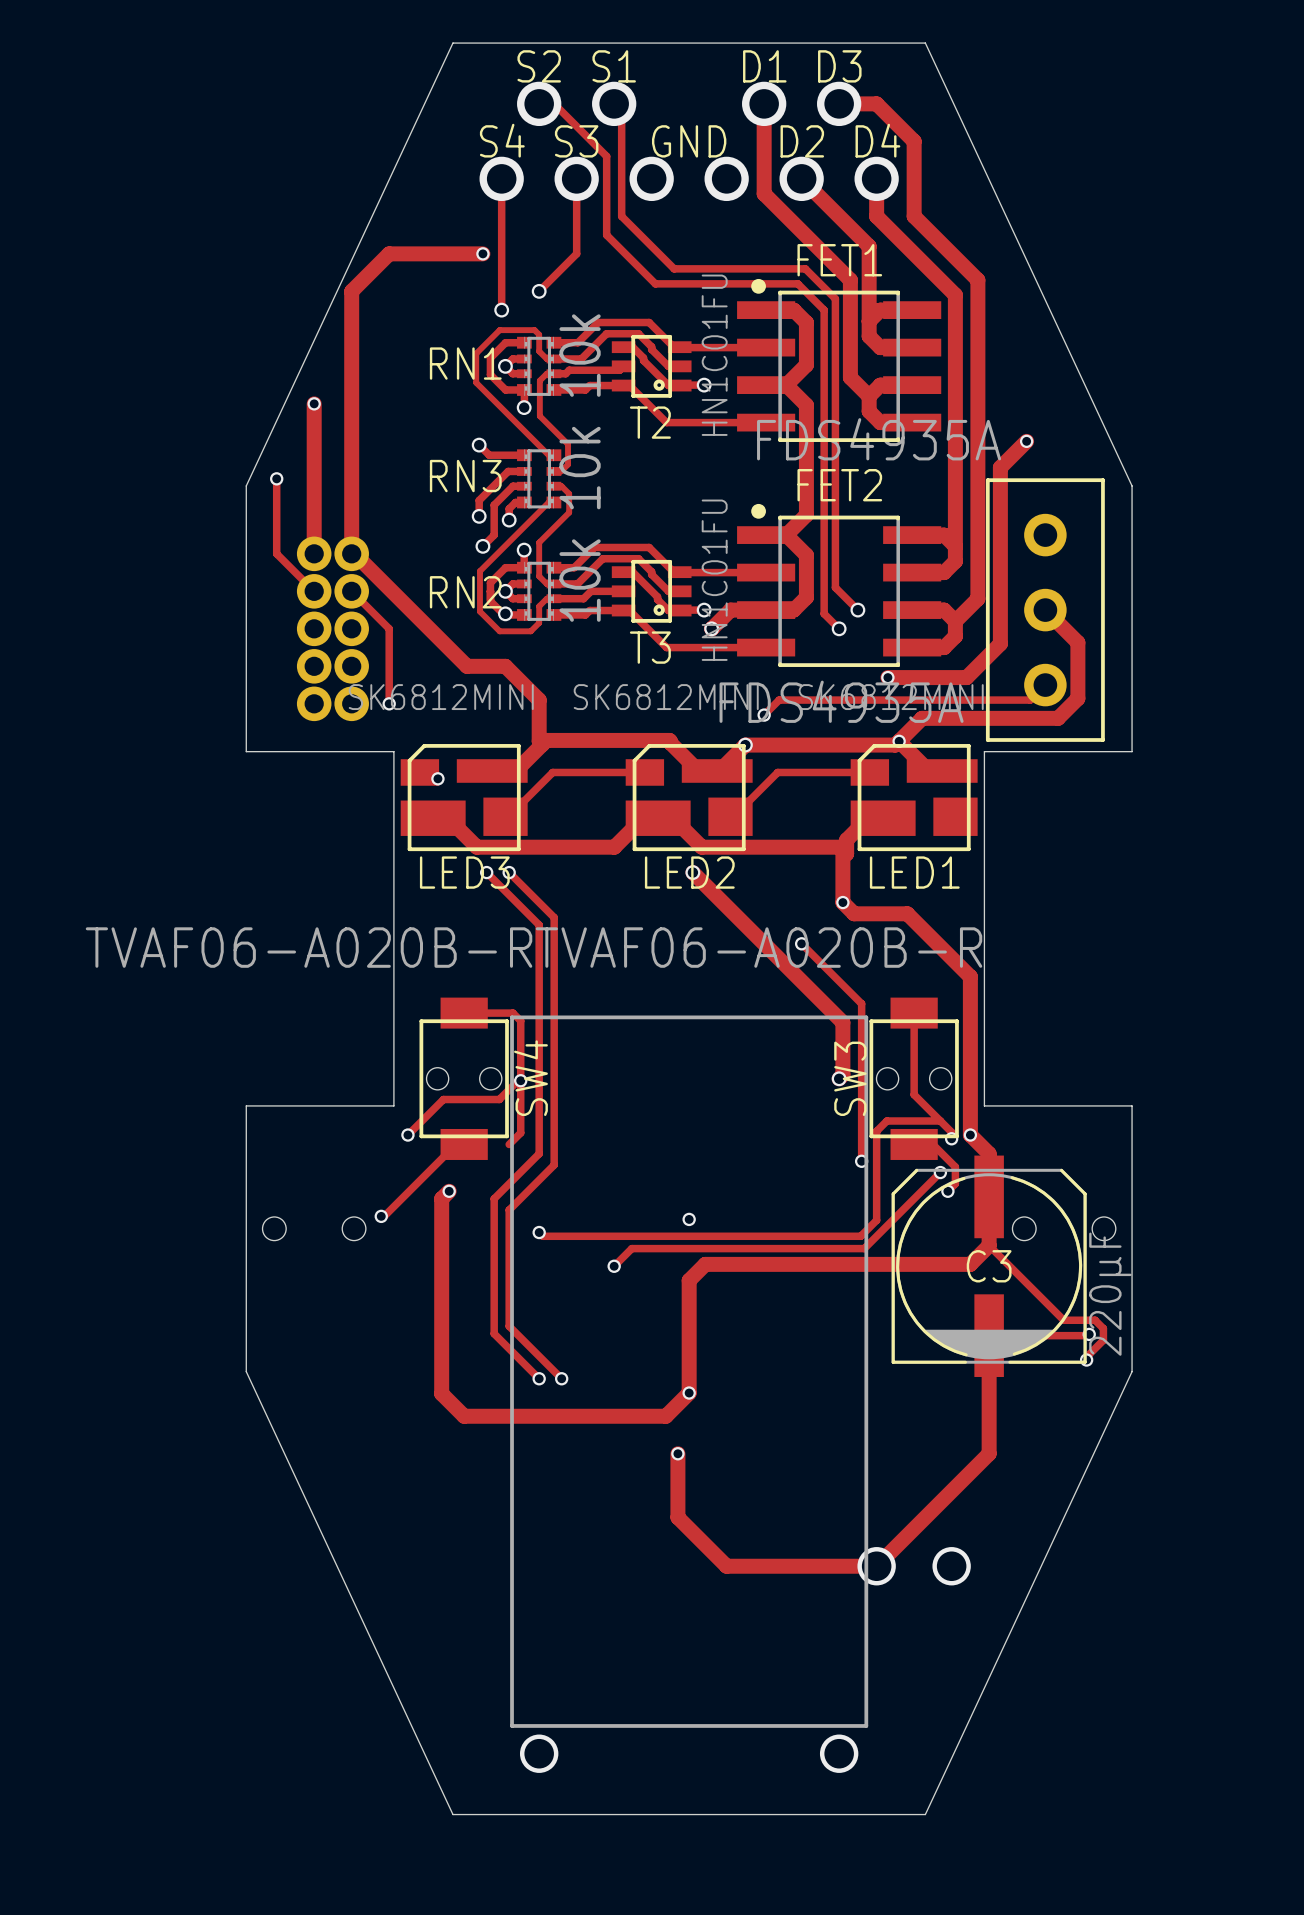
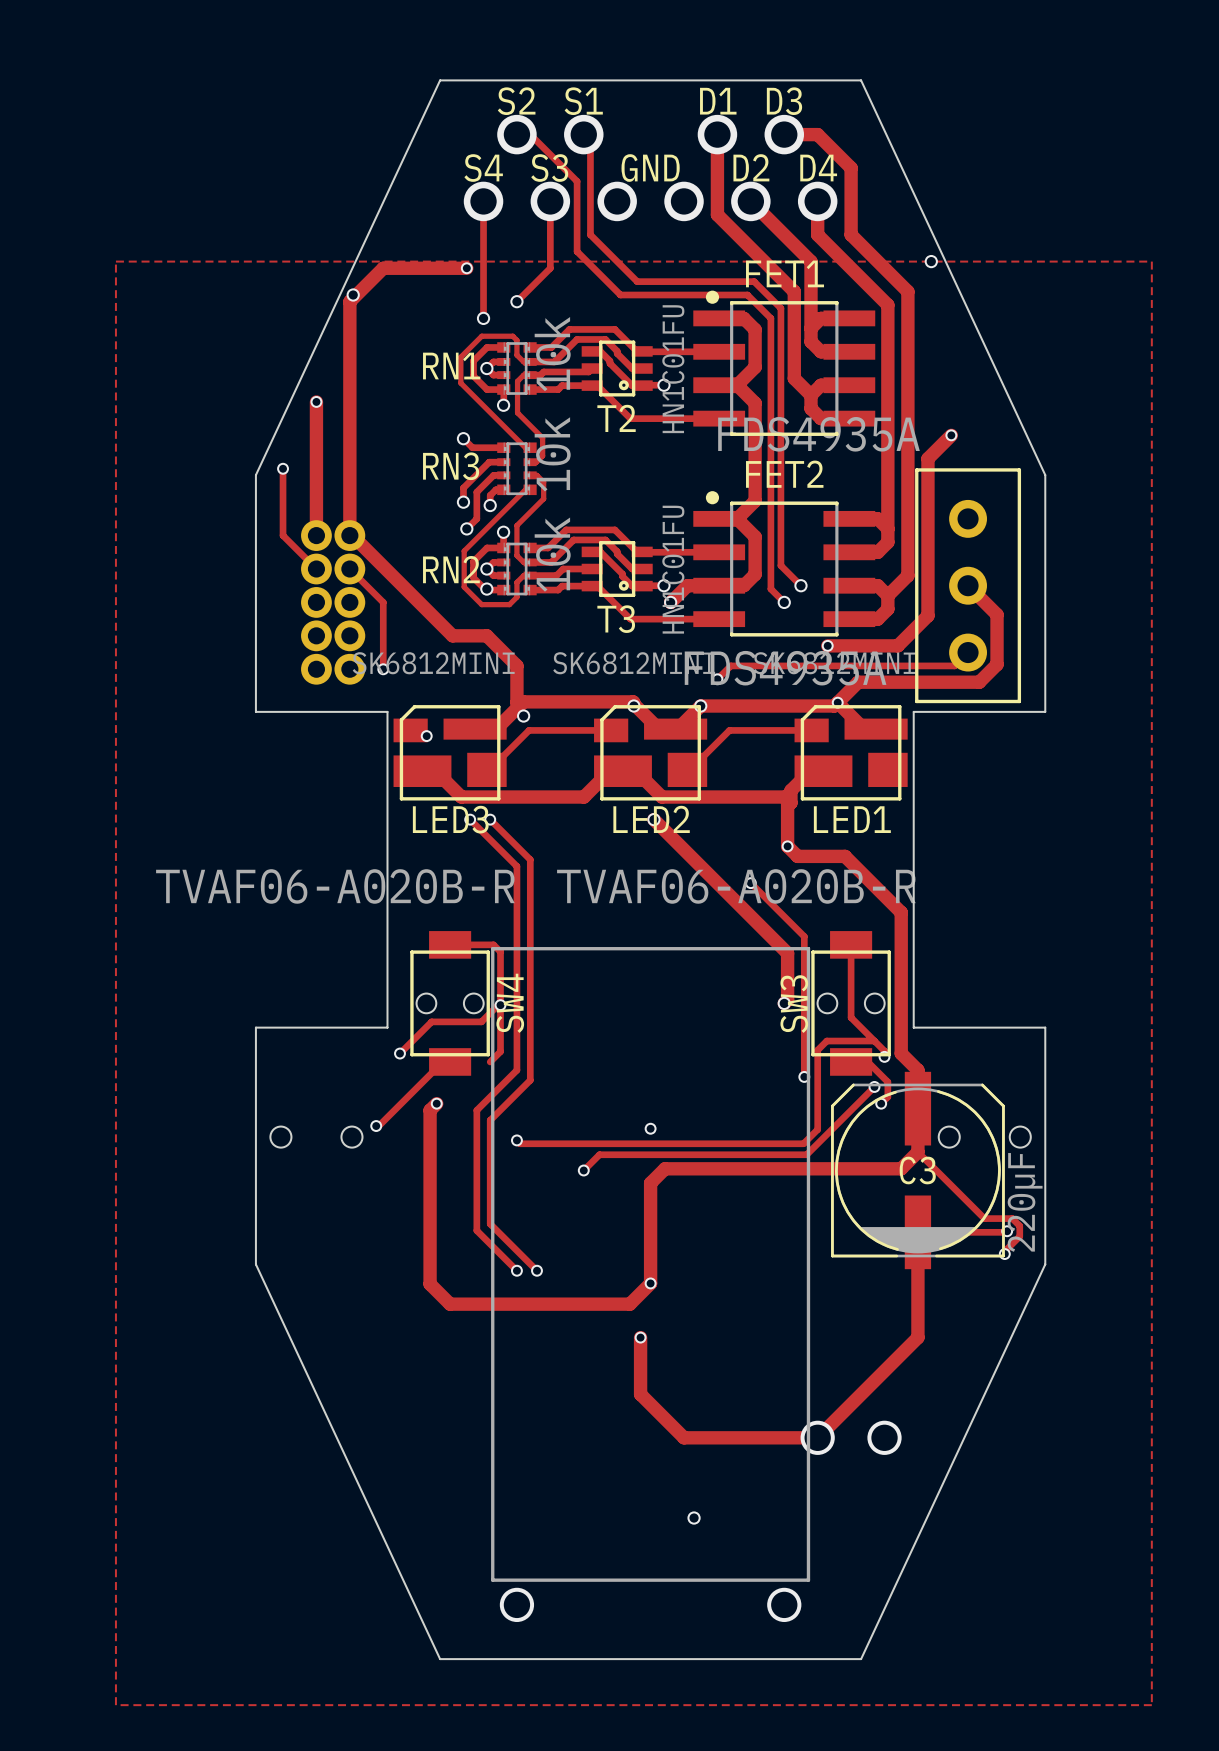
zone outline: none -> (115, 261) (1151, 261) (1151, 1705) (115, 1705) (115, 261)
via: none -> (931, 261)
via: none -> (353, 295)
via: none -> (633, 706)
via: none -> (523, 716)
via: (970, 1135) -> none
via: none -> (694, 1518)

